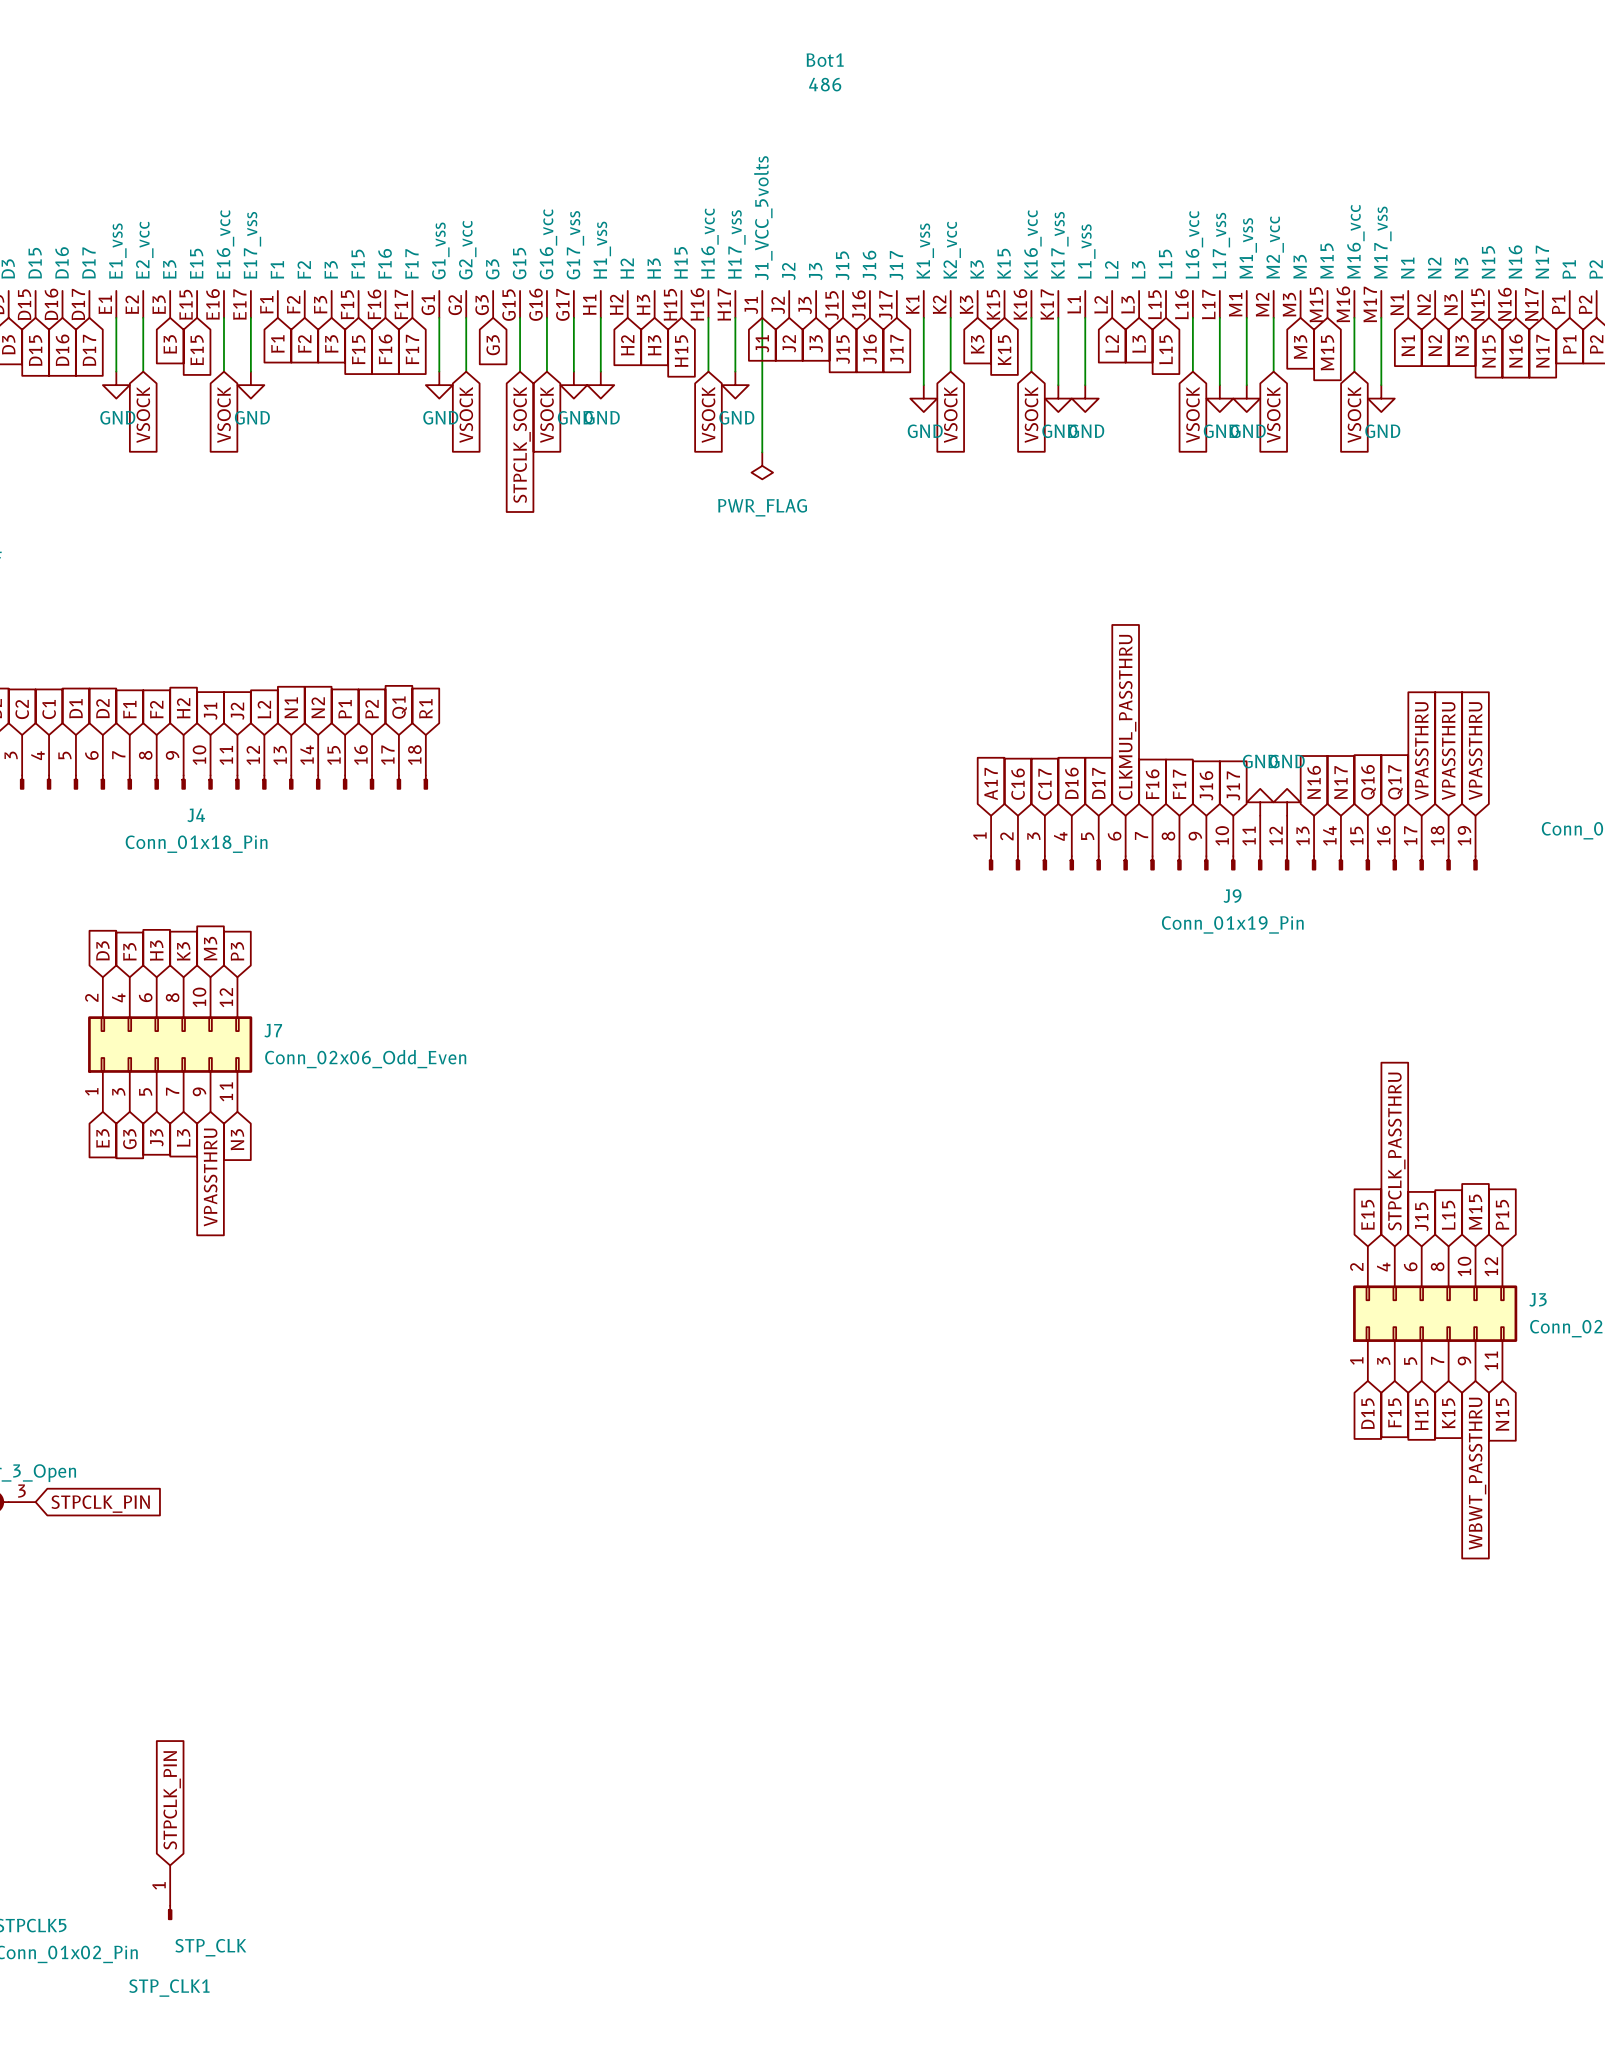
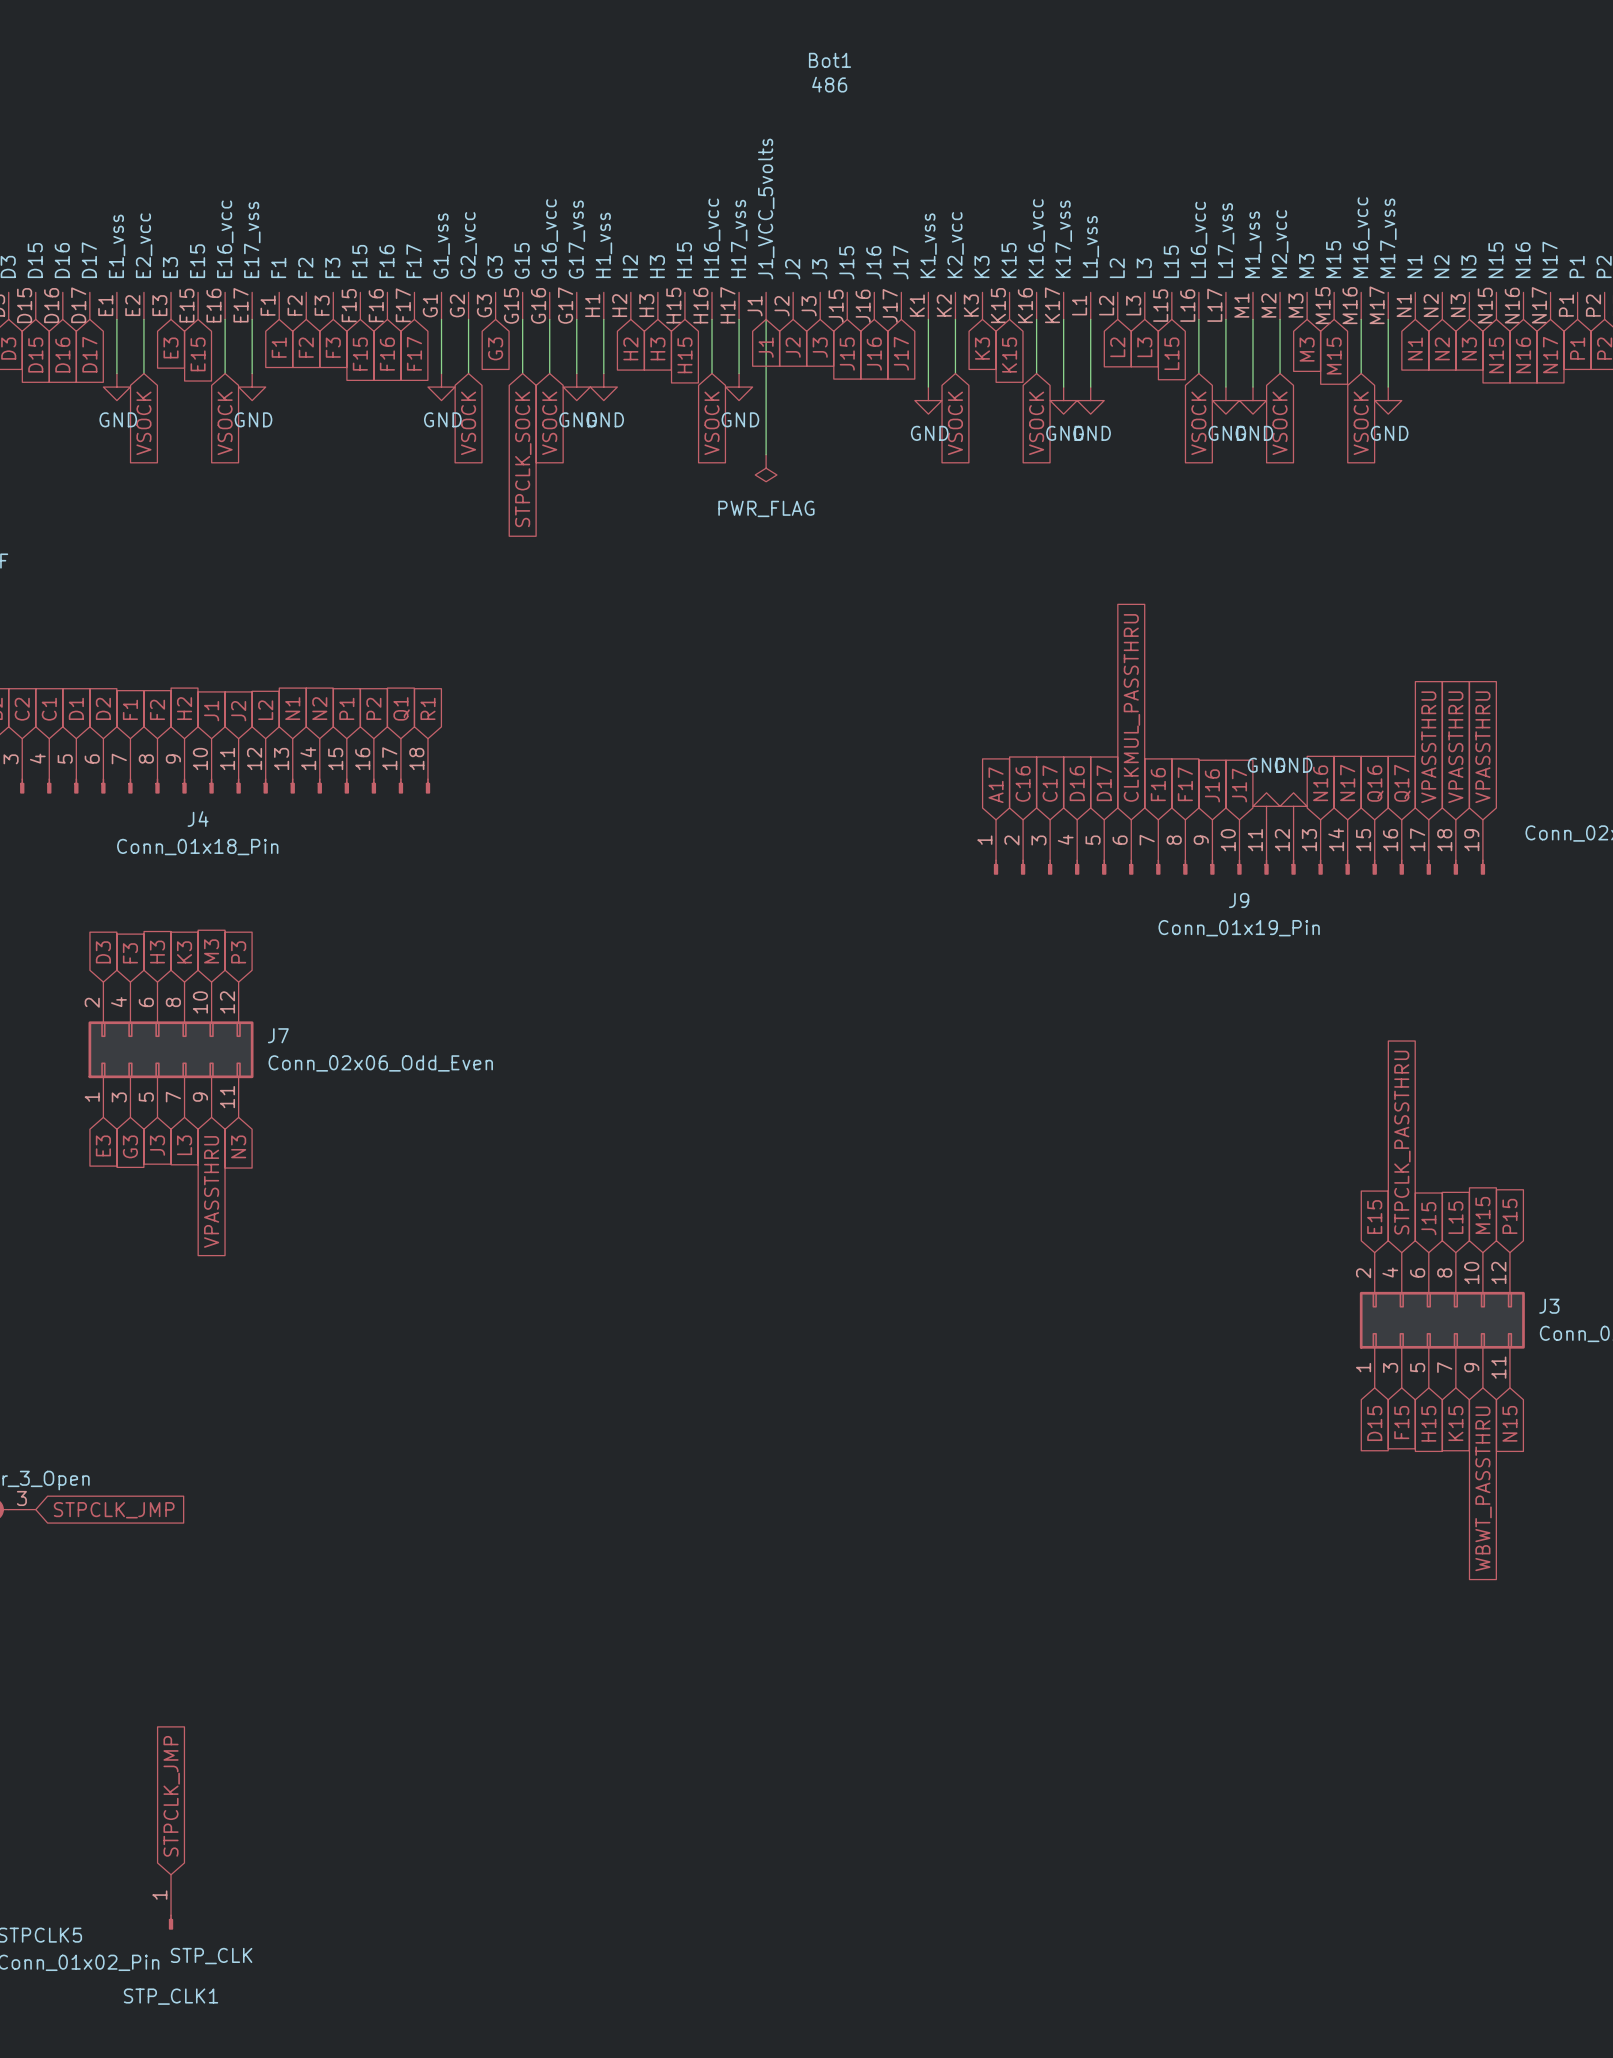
global label: STPCLK_PIN (100, 1504) -> STPCLK_JMP (114, 1510)
global label: STPCLK_PIN (172, 1800) -> STPCLK_JMP (171, 1796)

